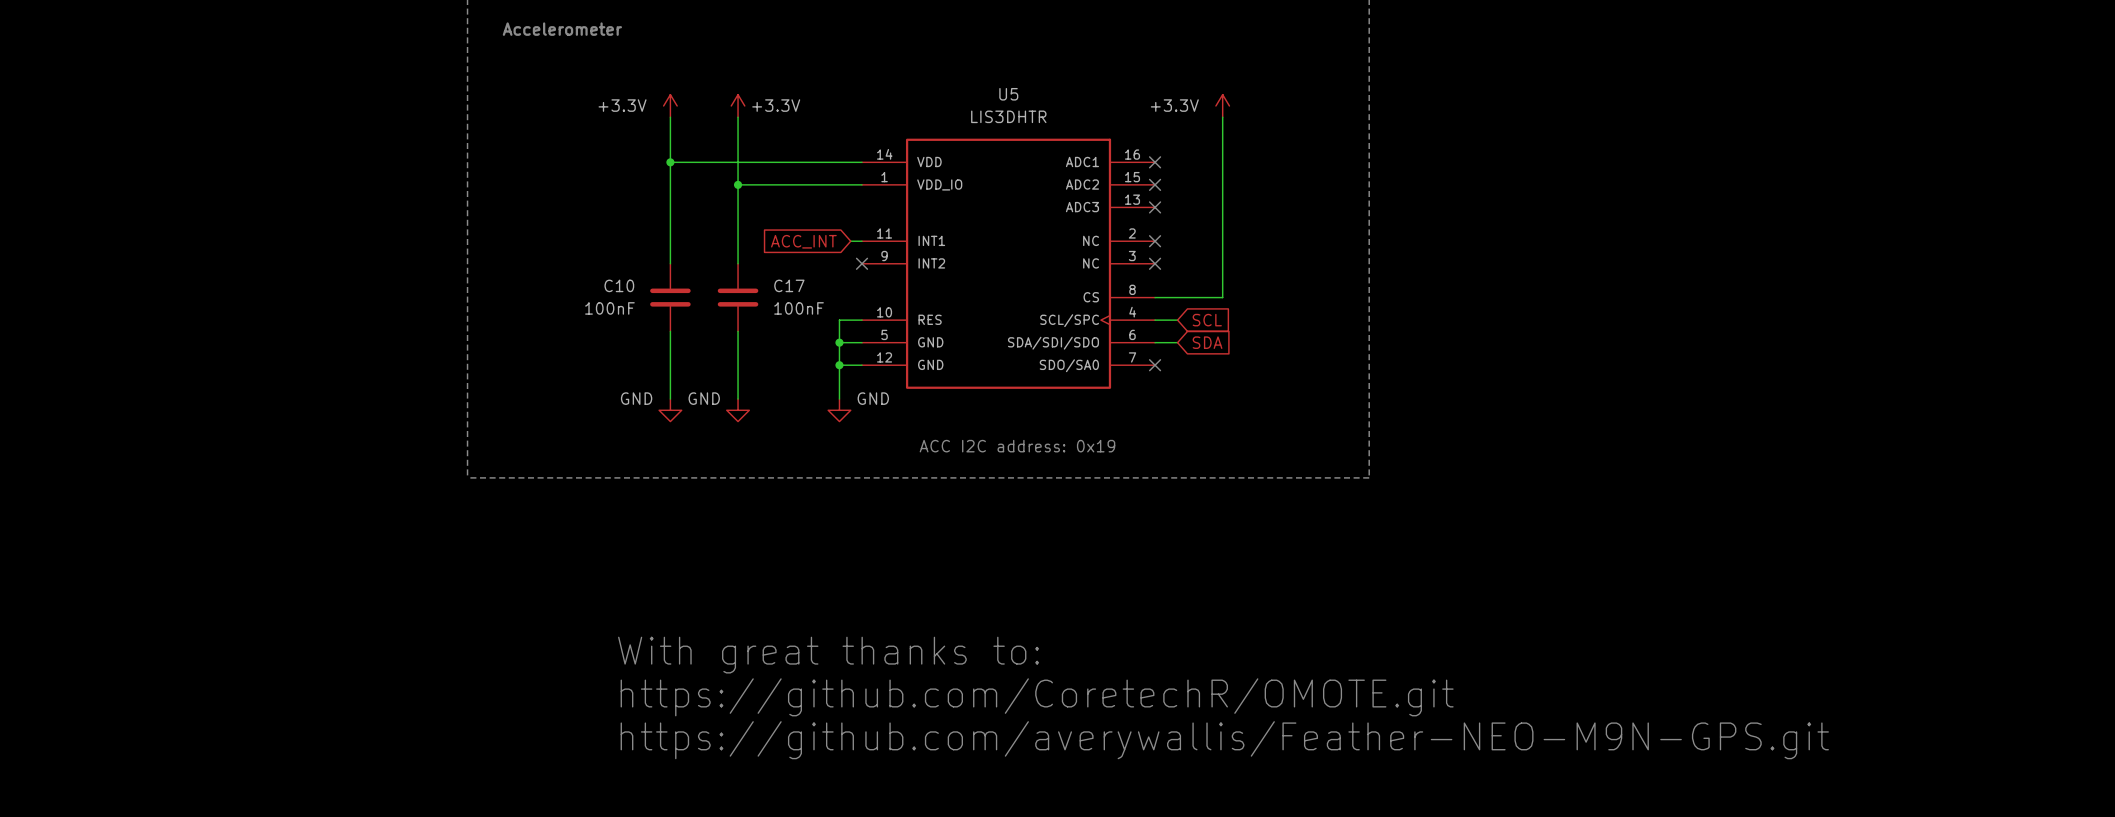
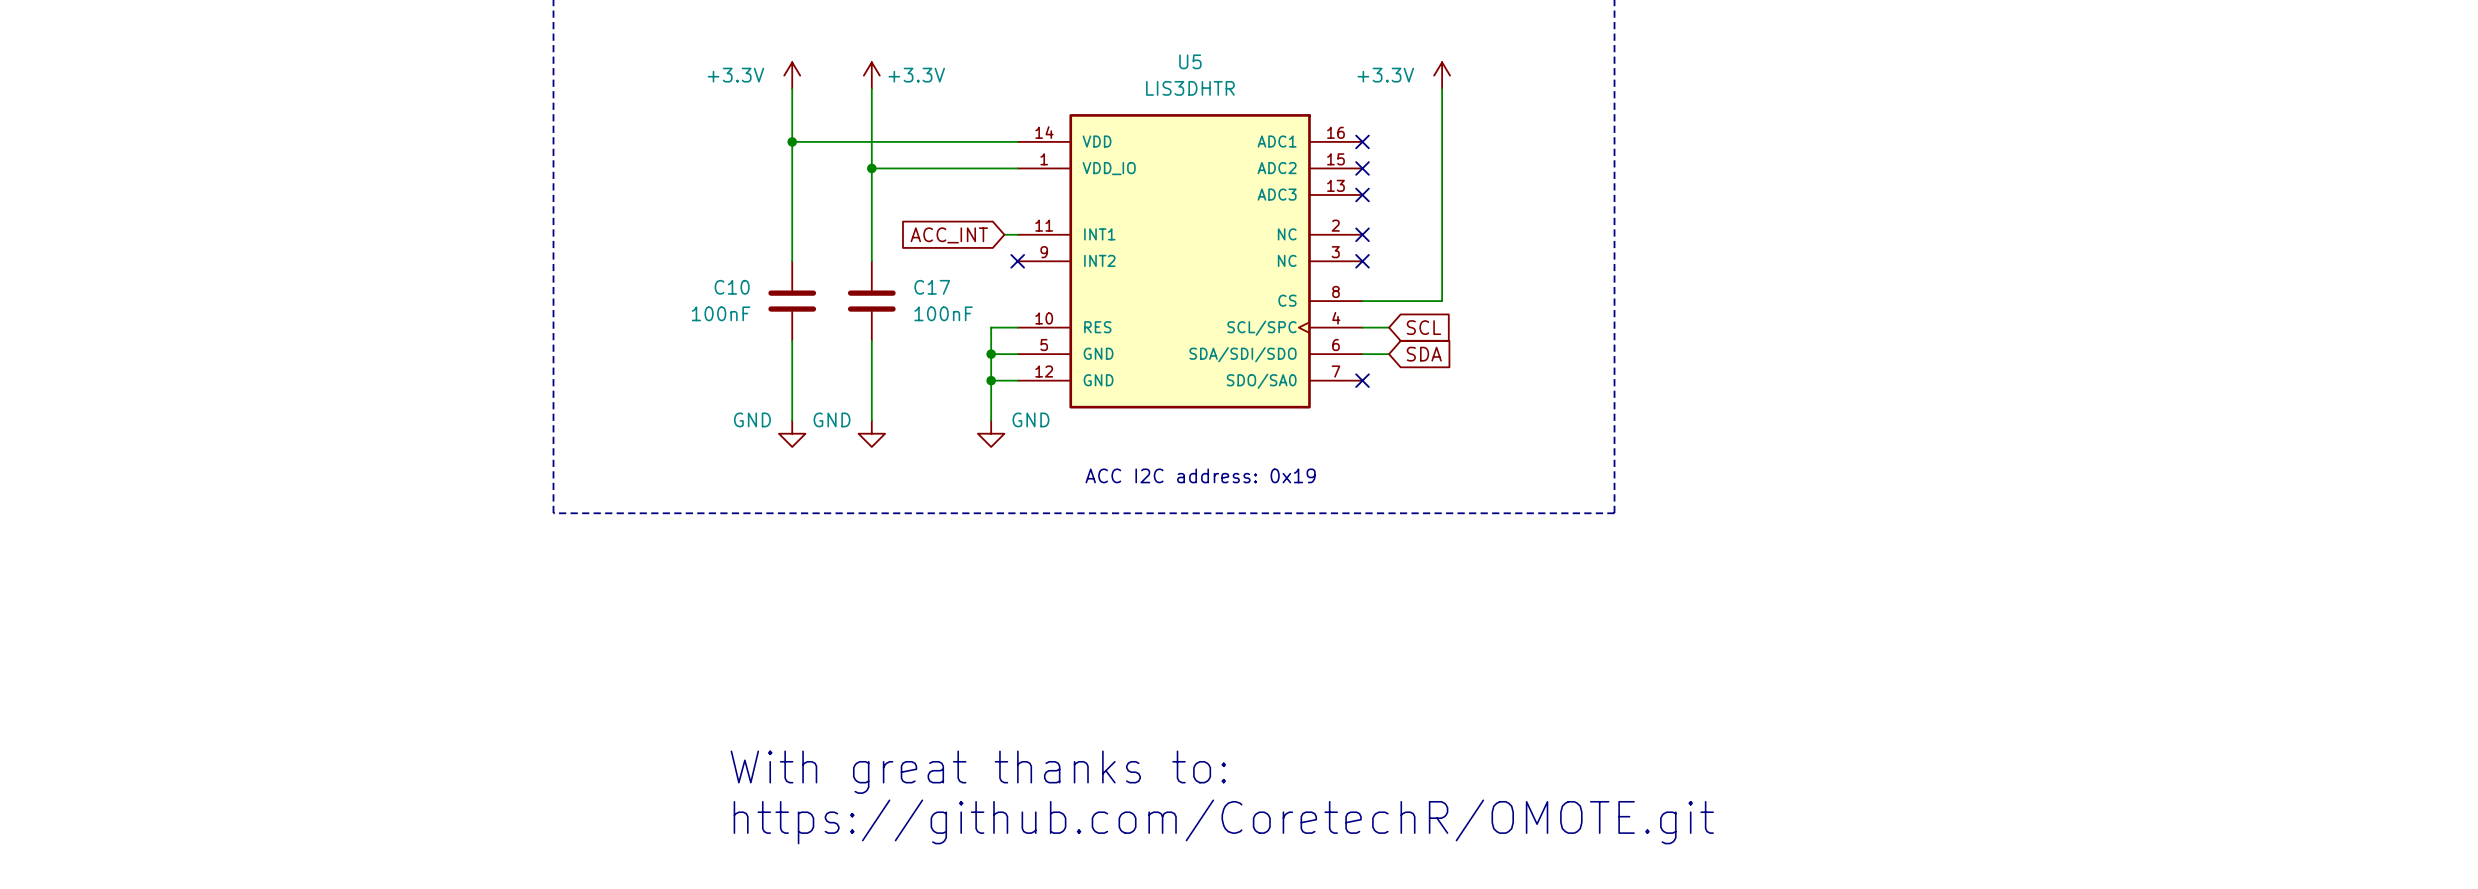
text: With great thanks to: (828, 655) -> none
text: https://github.com/CoretechR/OMOTE.git (1037, 697) -> With great thanks to: (978, 772)
text: https://github.com/averywallis/Feather-NEO-M9N-GPS.git (1224, 740) -> https://github.com/CoretechR/OMOTE.git (1223, 821)

